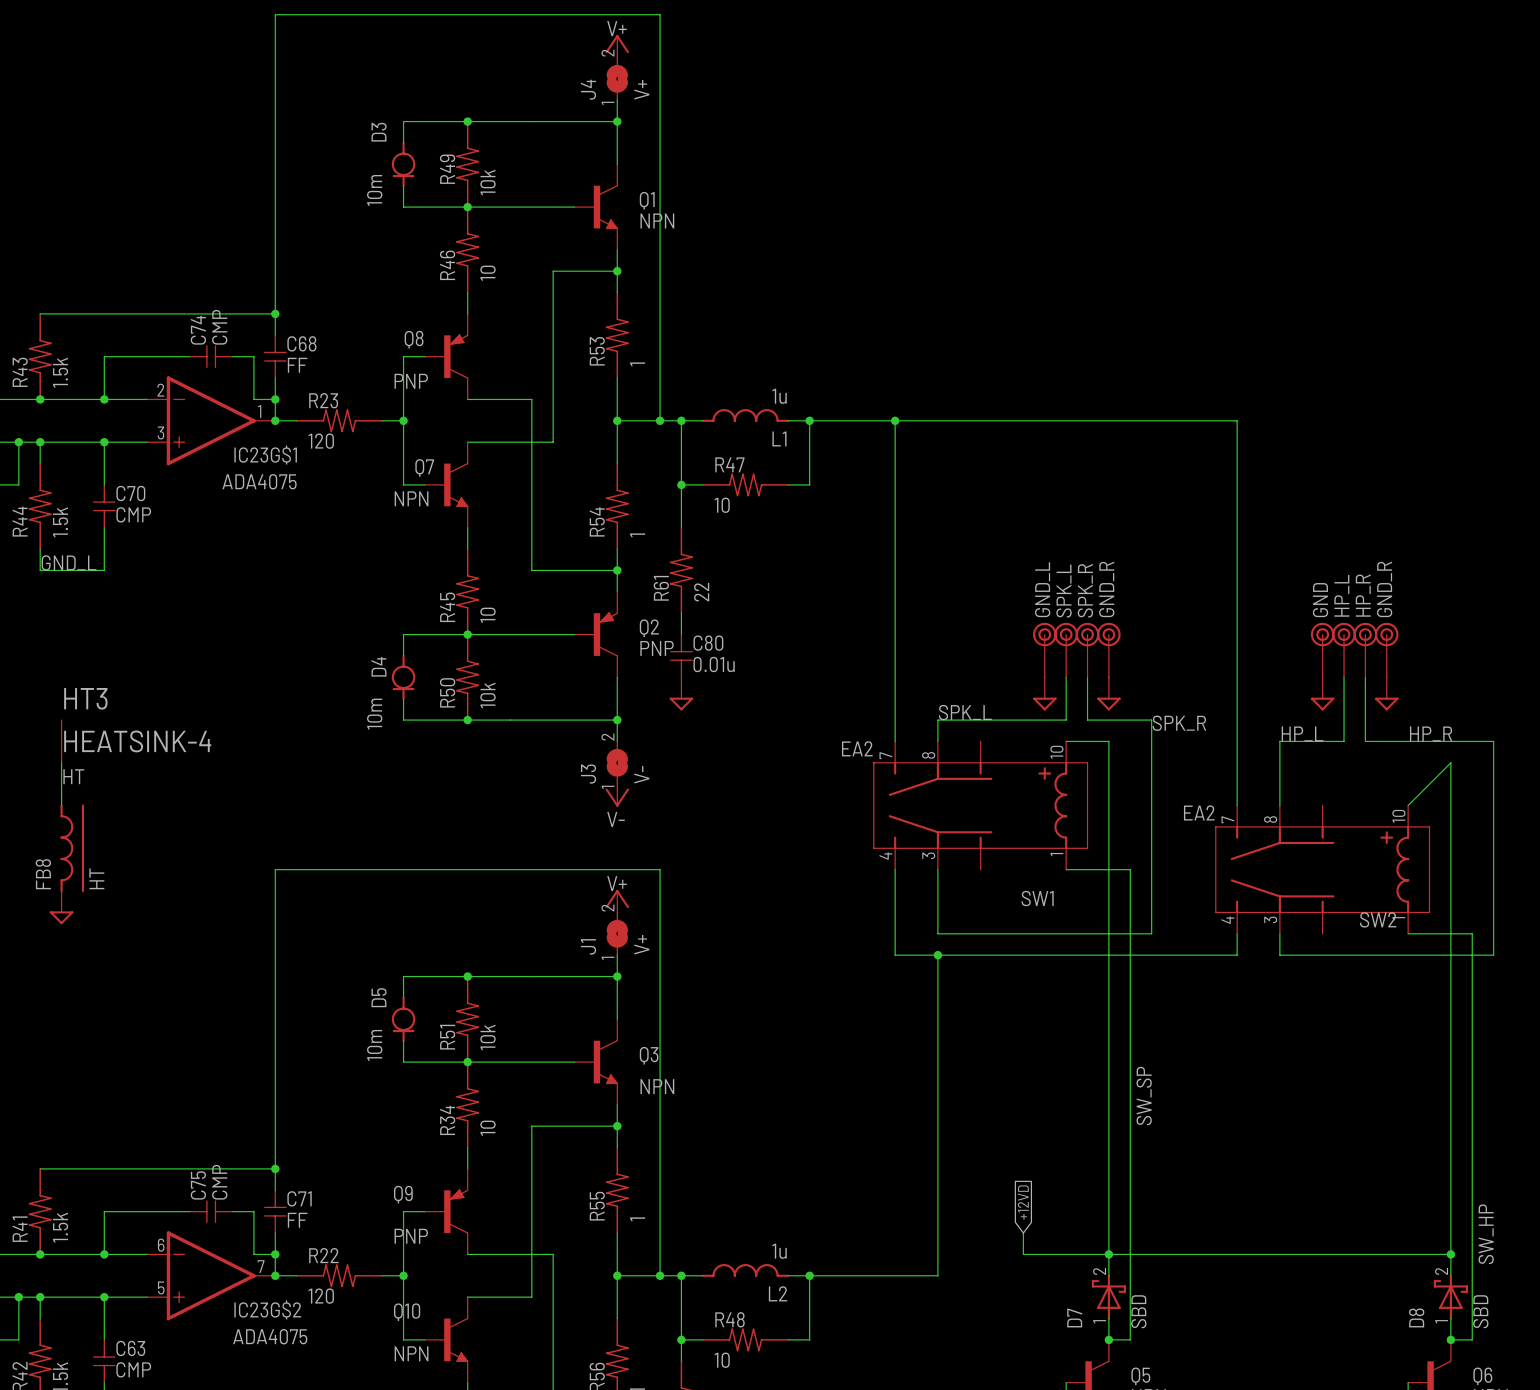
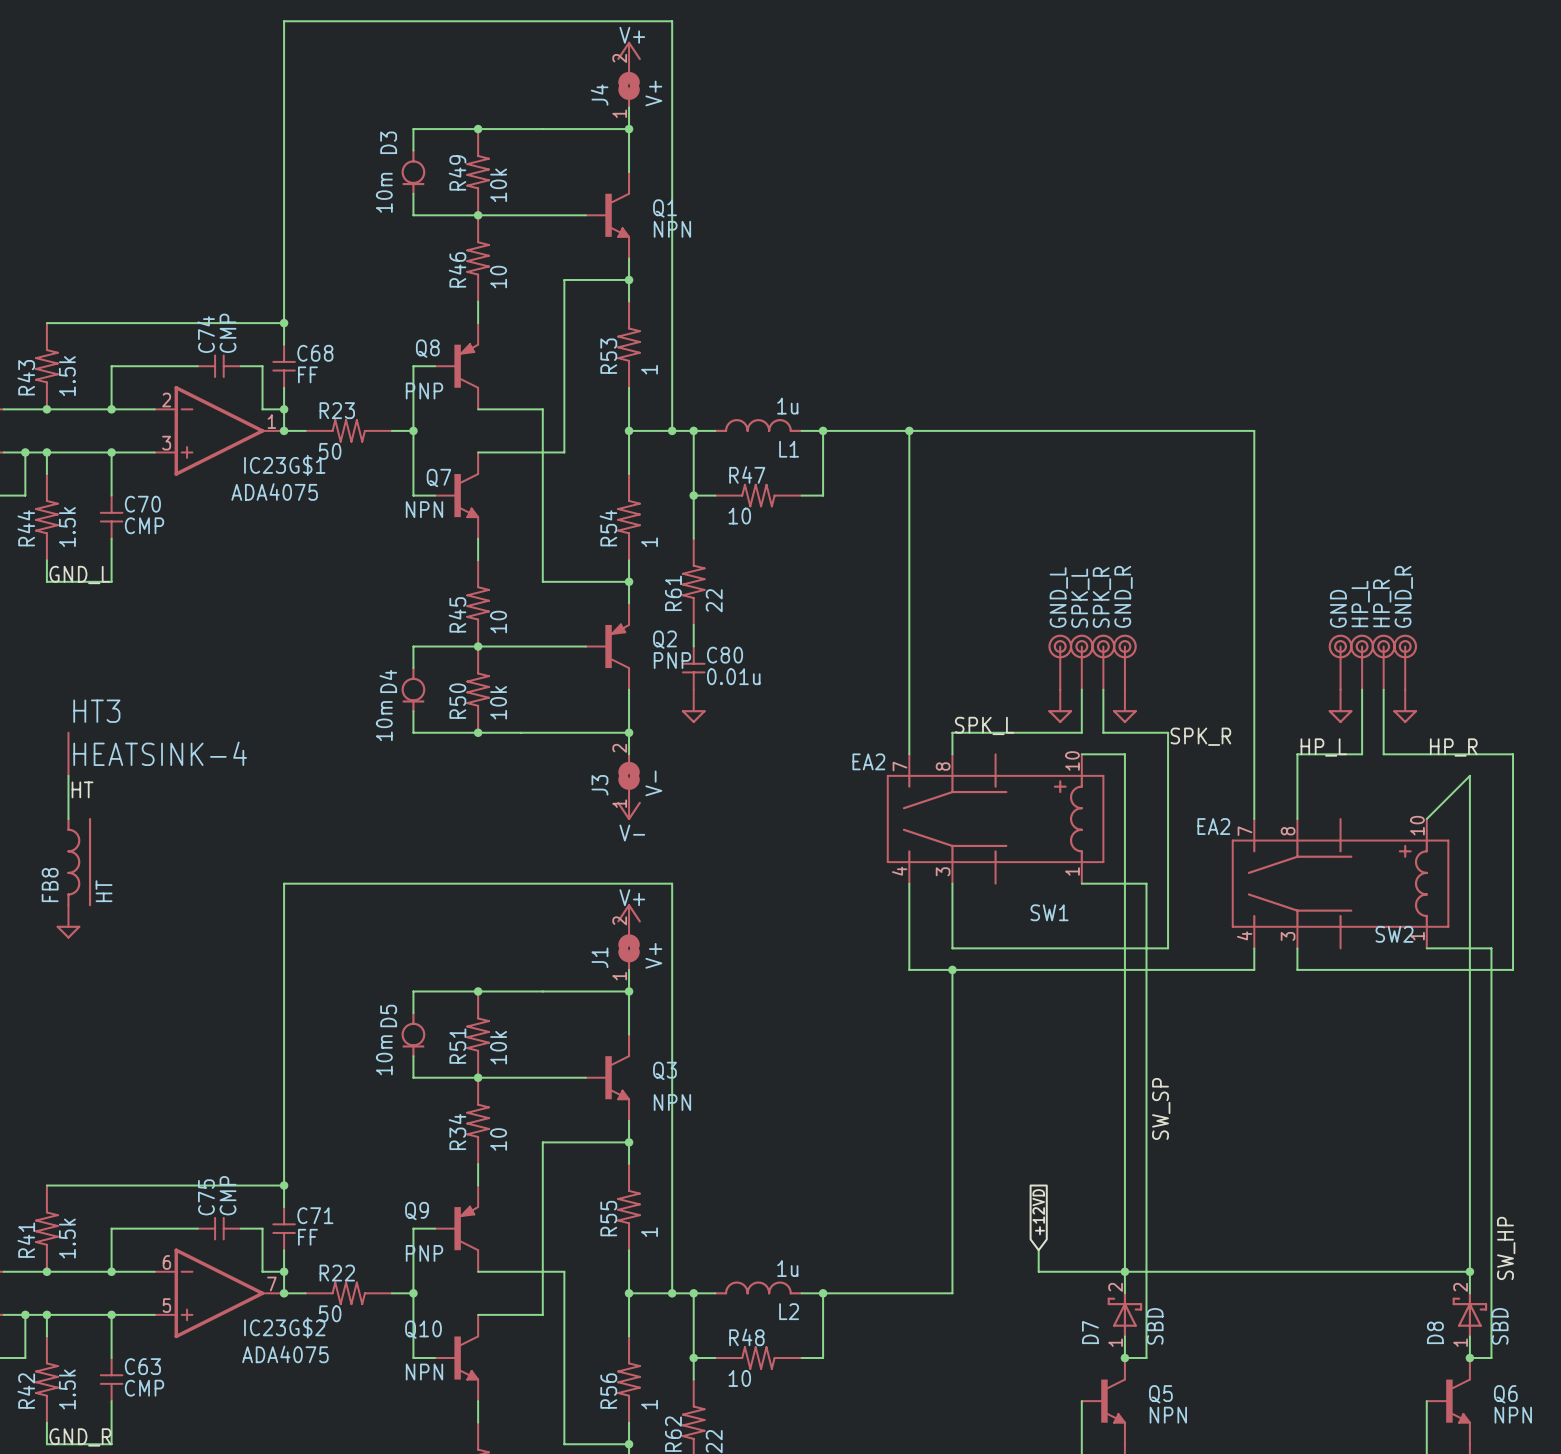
R23 value: 120 (321, 441) -> 50 (330, 451)
R22 value: 120 (321, 1296) -> 50 (330, 1313)

